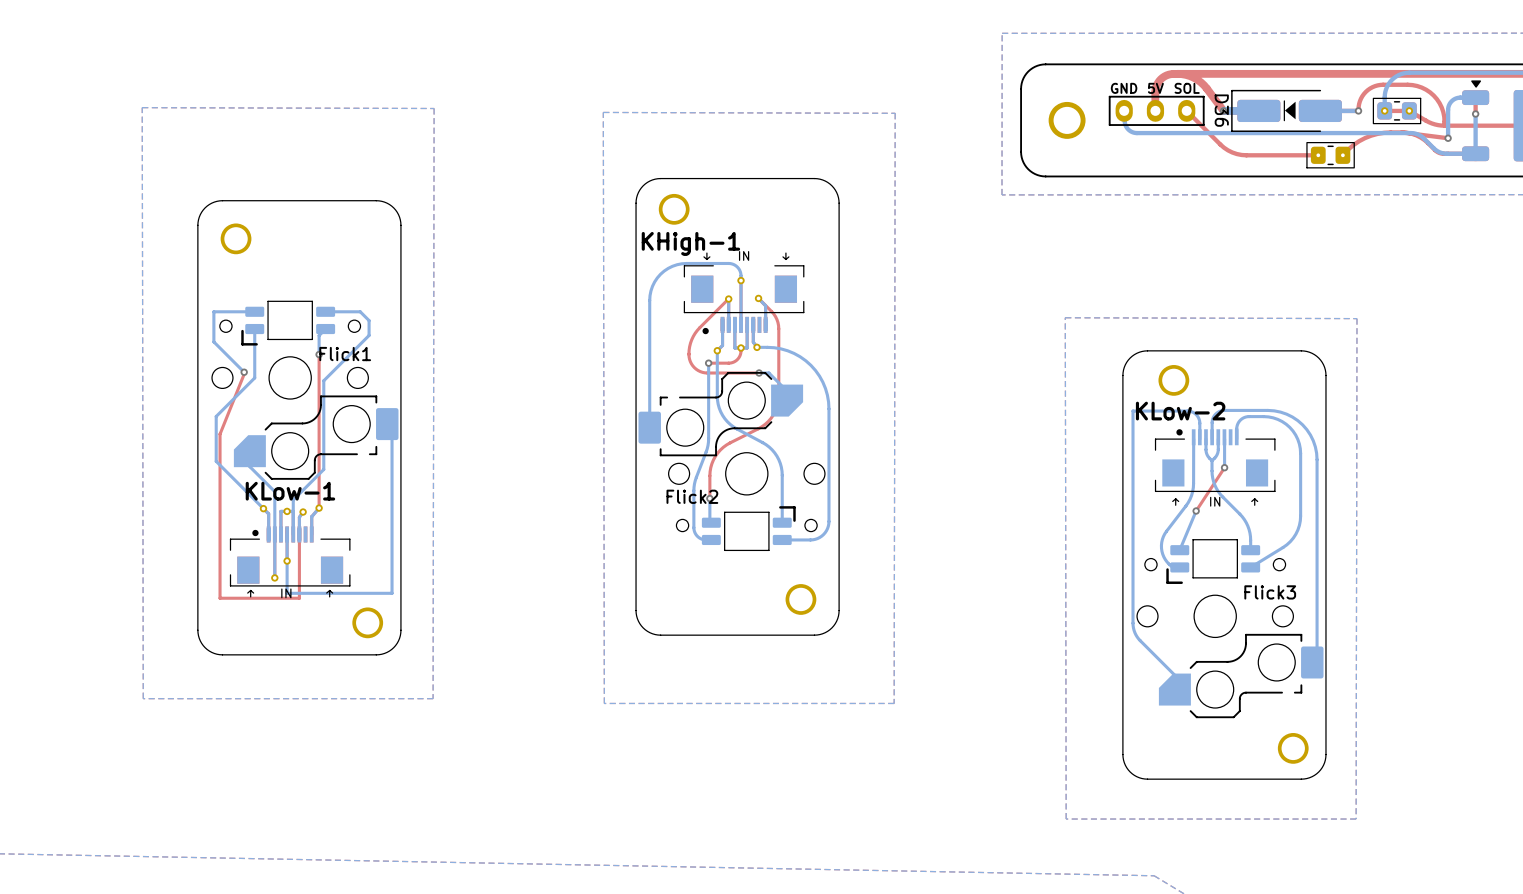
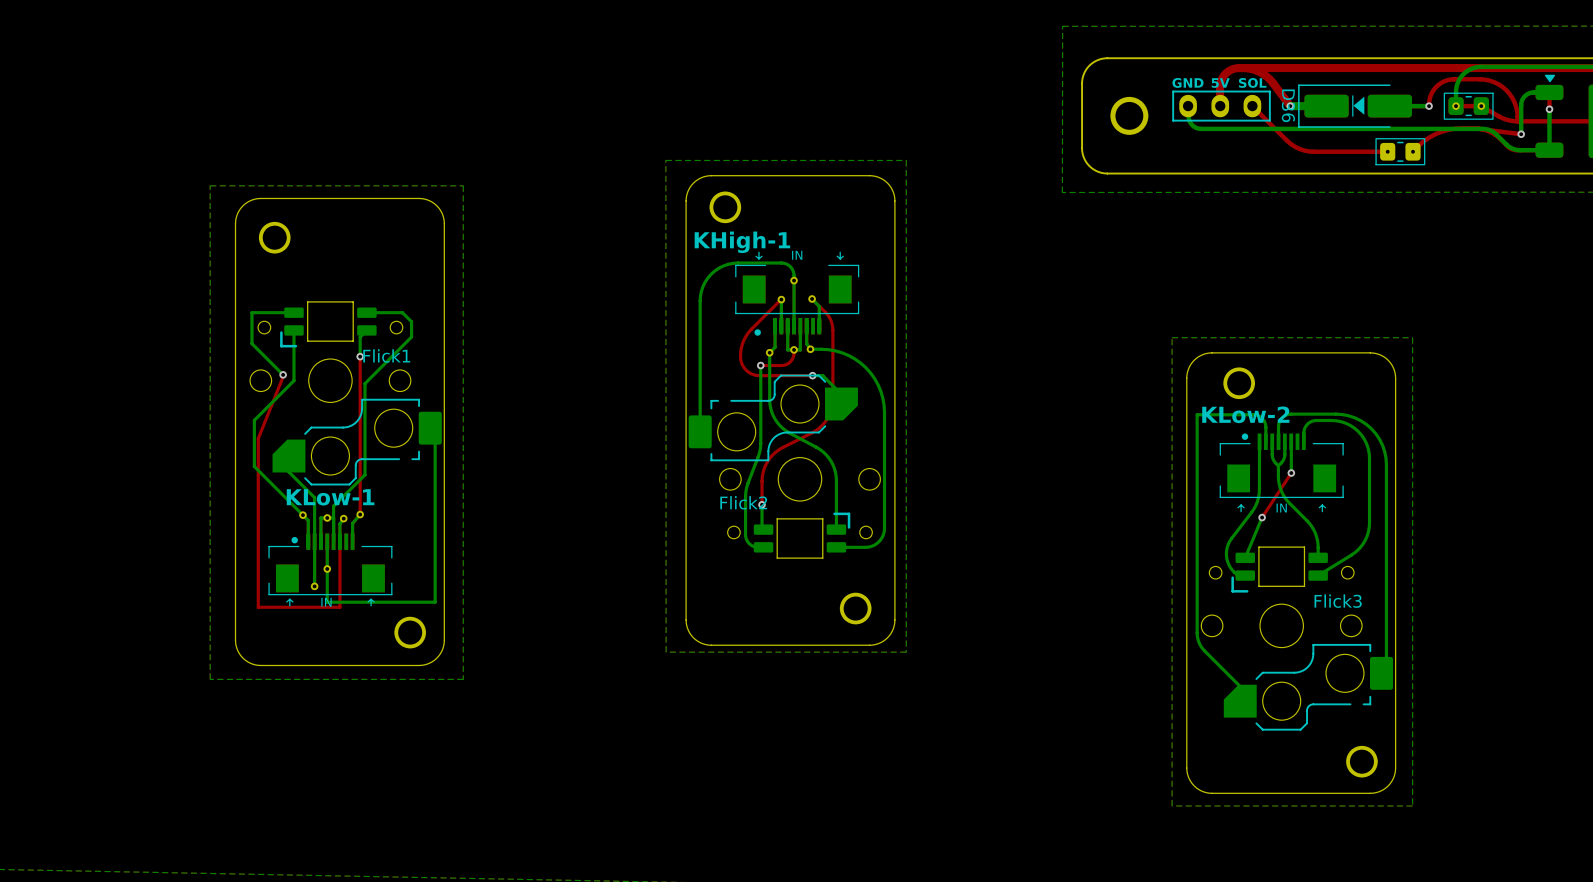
bottom zone outline: (142, 107) (143, 698) (433, 698) (434, 108) (142, 107) -> (463, 185) (463, 679) (210, 679) (210, 185) (463, 185)
bottom zone outline: (603, 112) (604, 703) (894, 703) (895, 113) (603, 112) -> (906, 160) (906, 652) (666, 652) (665, 160) (906, 160)
bottom zone outline: (1065, 317) (1066, 819) (1356, 819) (1356, 318) (1065, 317) -> (1412, 337) (1412, 805) (1172, 805) (1172, 337) (1412, 337)

